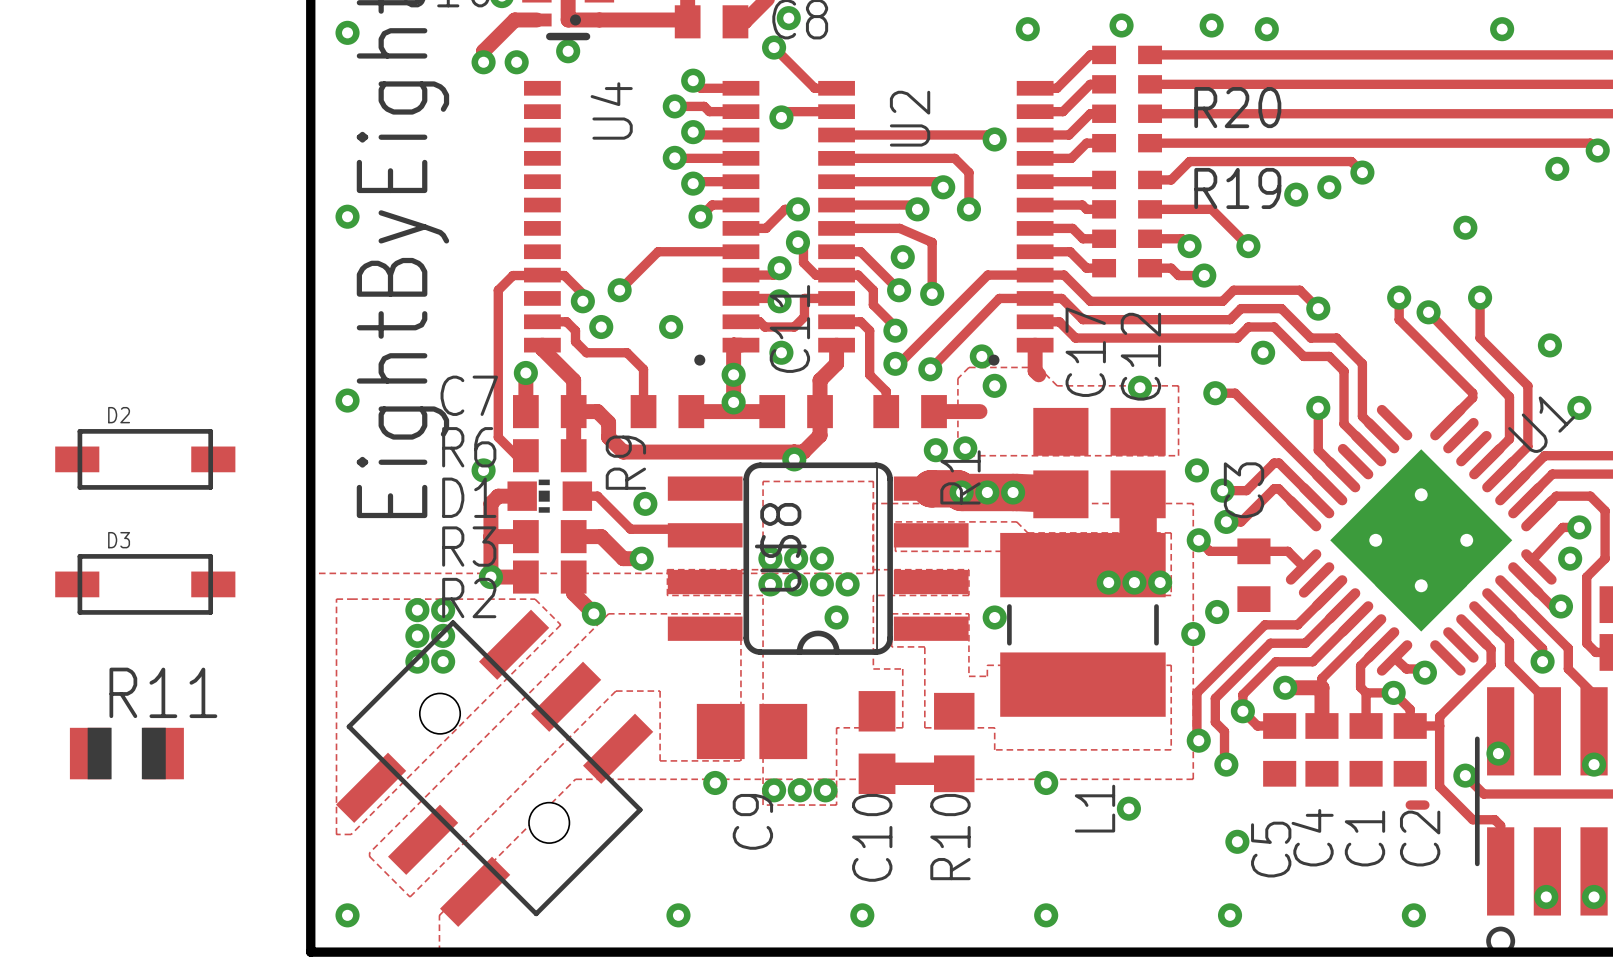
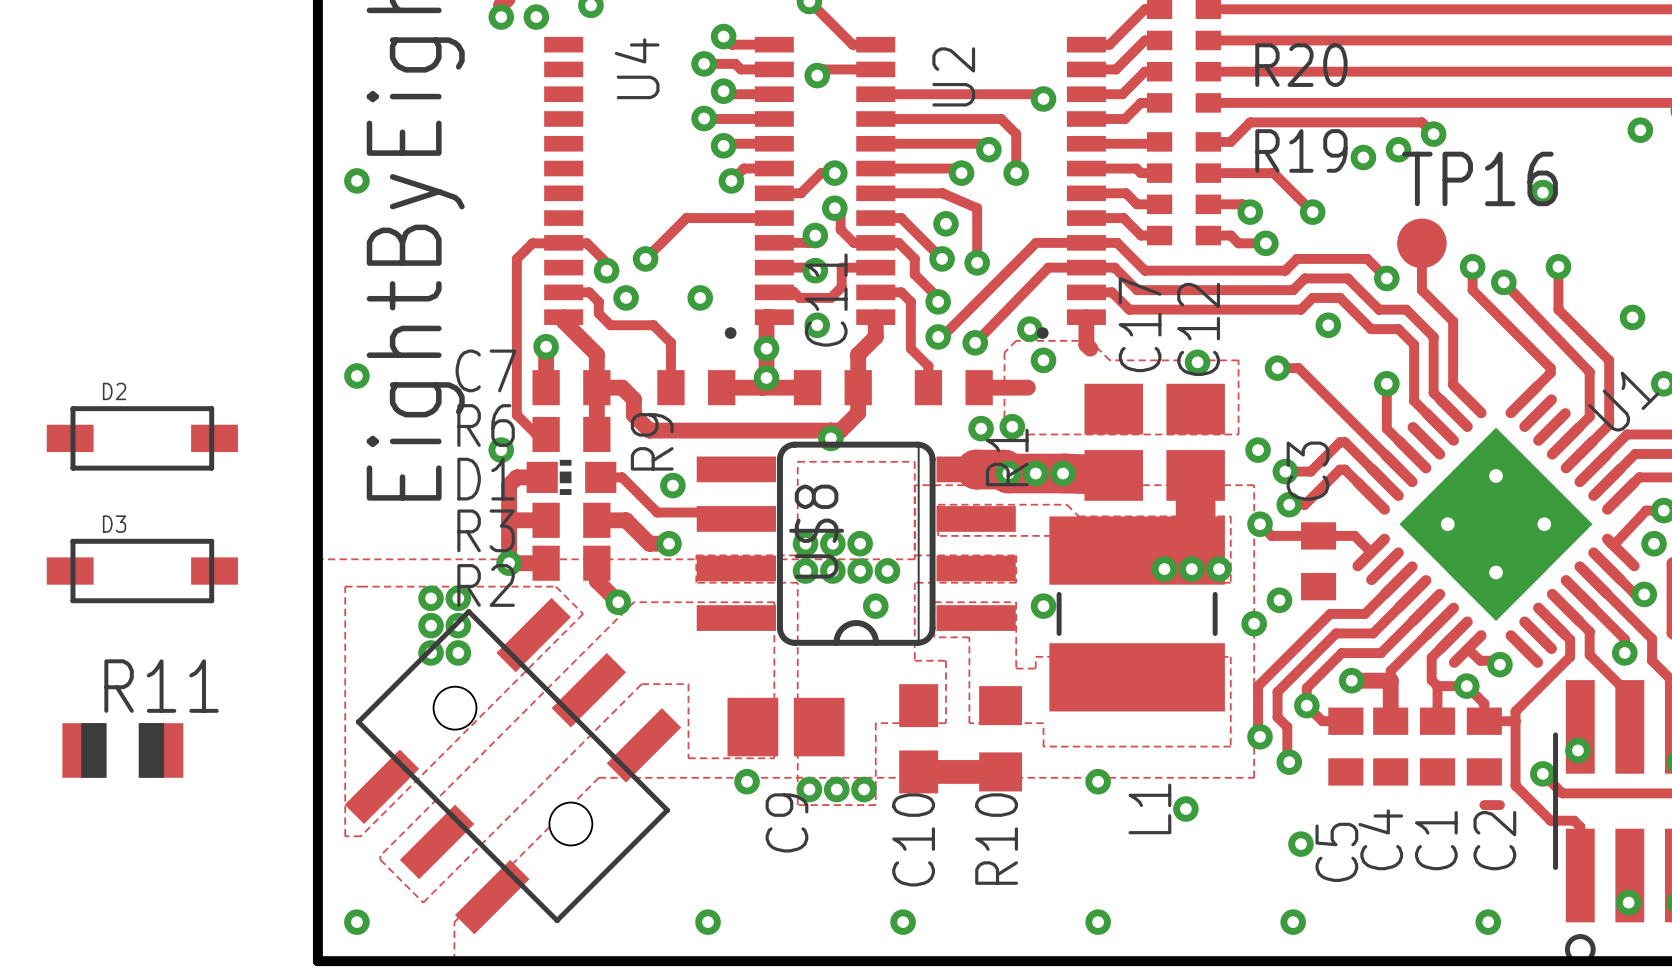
track: none -> (1421, 243) (1421, 290) (1453, 321) (1453, 384) (1467, 399)
TP16: none -> (1421, 243)

